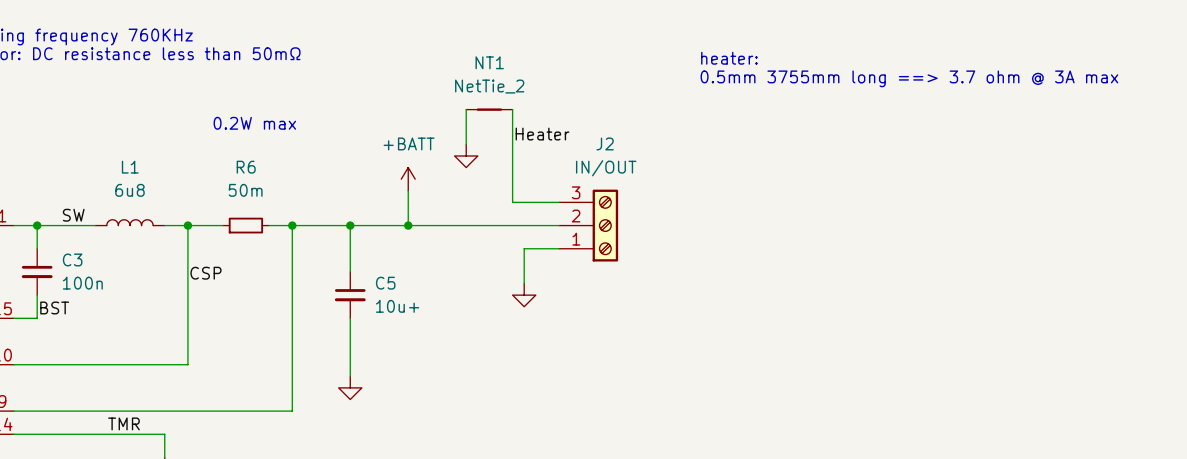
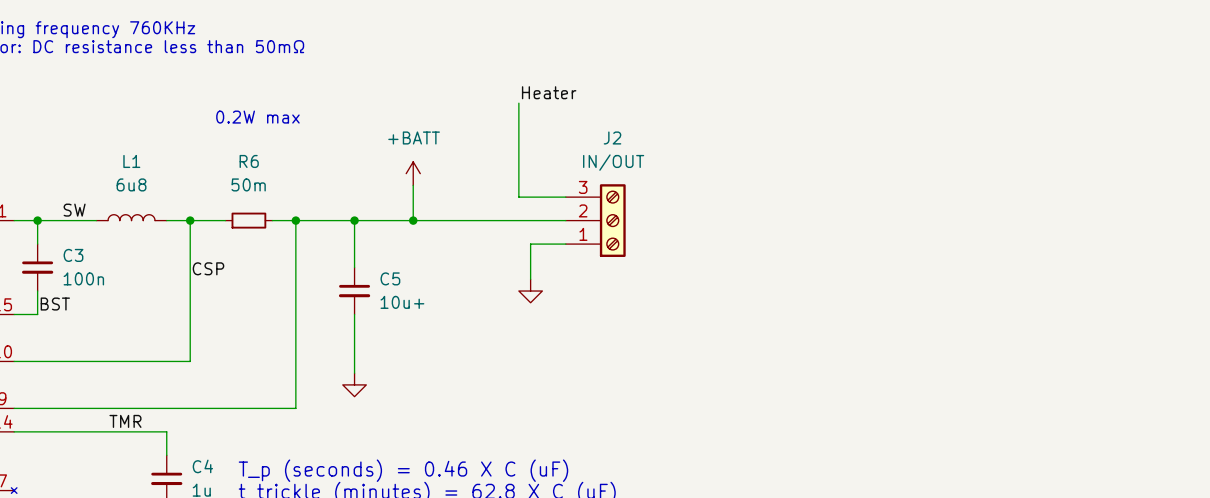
text: heater: (729, 58) -> none
text: 0.5mm 3755mm long ==> 3.7 ohm @ 3A max (909, 78) -> none
wire: (466, 109) (466, 144) -> none
NT1: NetTie_2 (489, 109) -> none
label position: Heater (542, 134) -> Heater (549, 92)
power symbol: (466, 155) -> none

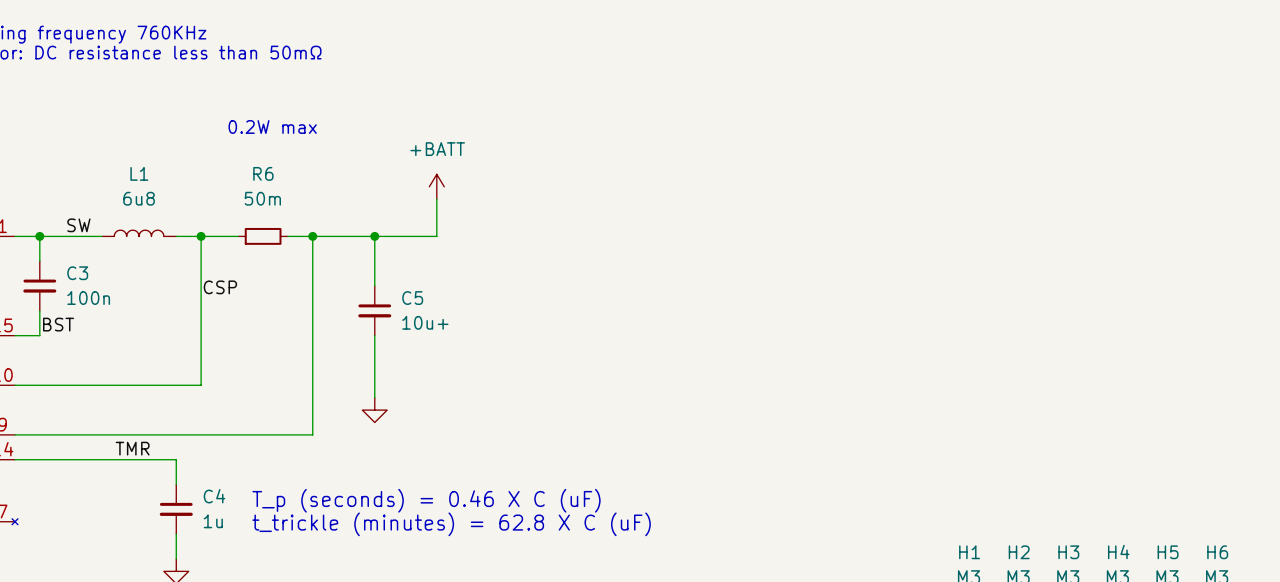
label: Heater (549, 92) -> none
wire: (518, 103) (518, 197) (565, 197) -> none
wire: (413, 220) (565, 220) -> none
junction: (413, 220) -> none
J2: IN/OUT (595, 220) -> none
wire: (565, 244) (530, 244) (530, 279) -> none
power symbol: (530, 291) -> none

